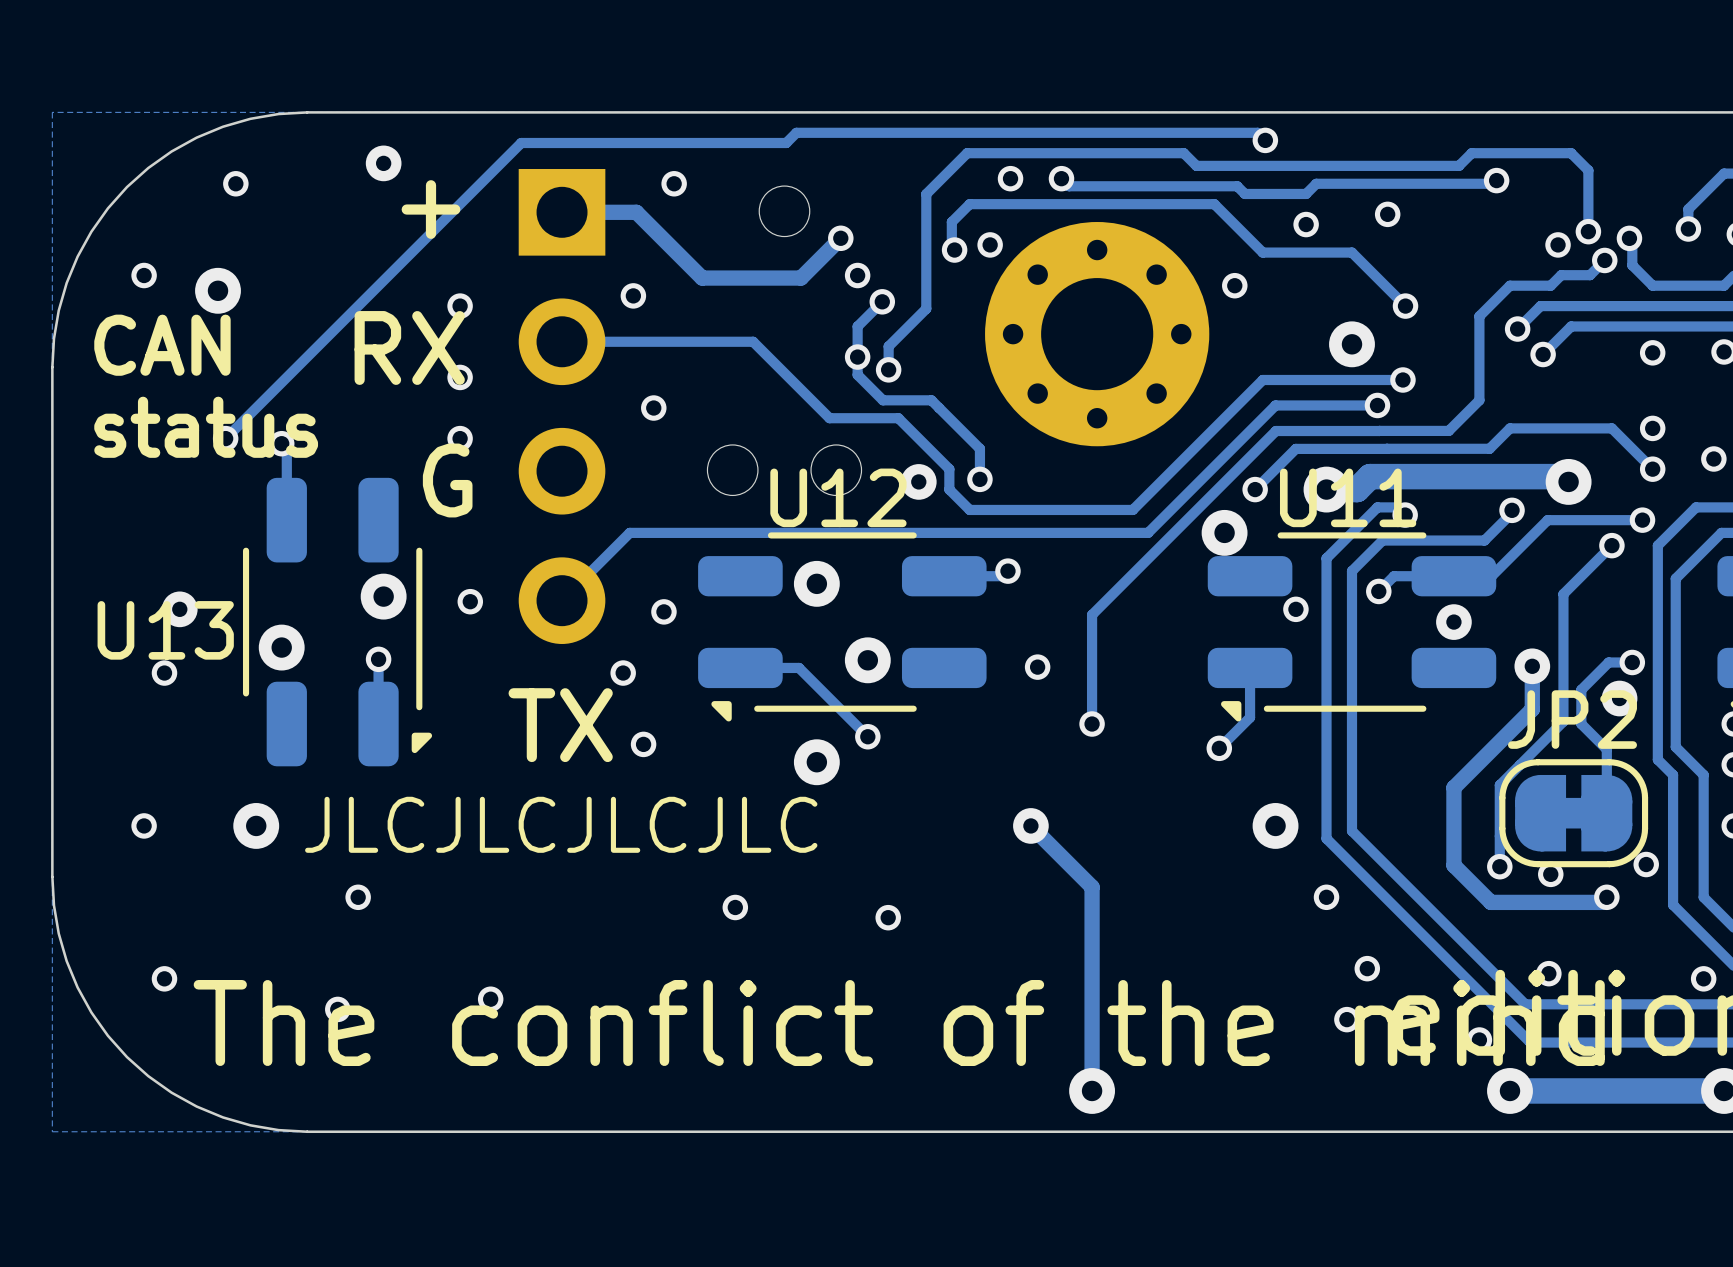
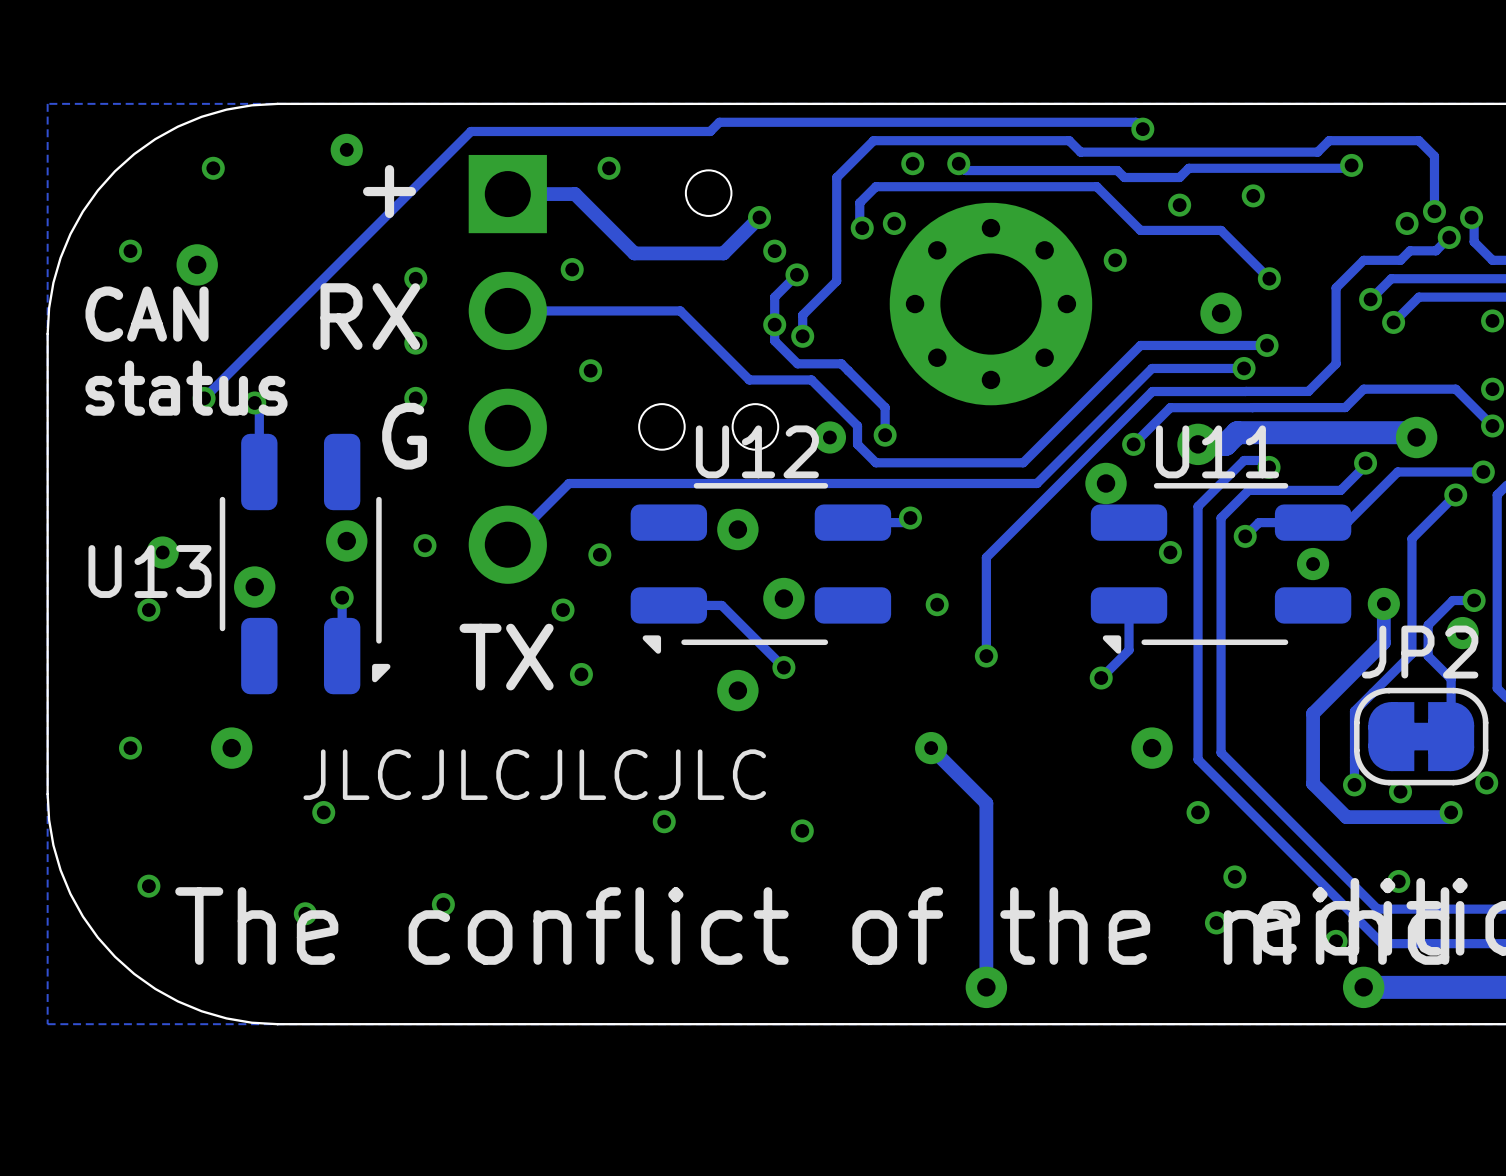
text position: JLCJLCJLCJLC (561, 824) -> JLCJLCJLCJLC (534, 774)

